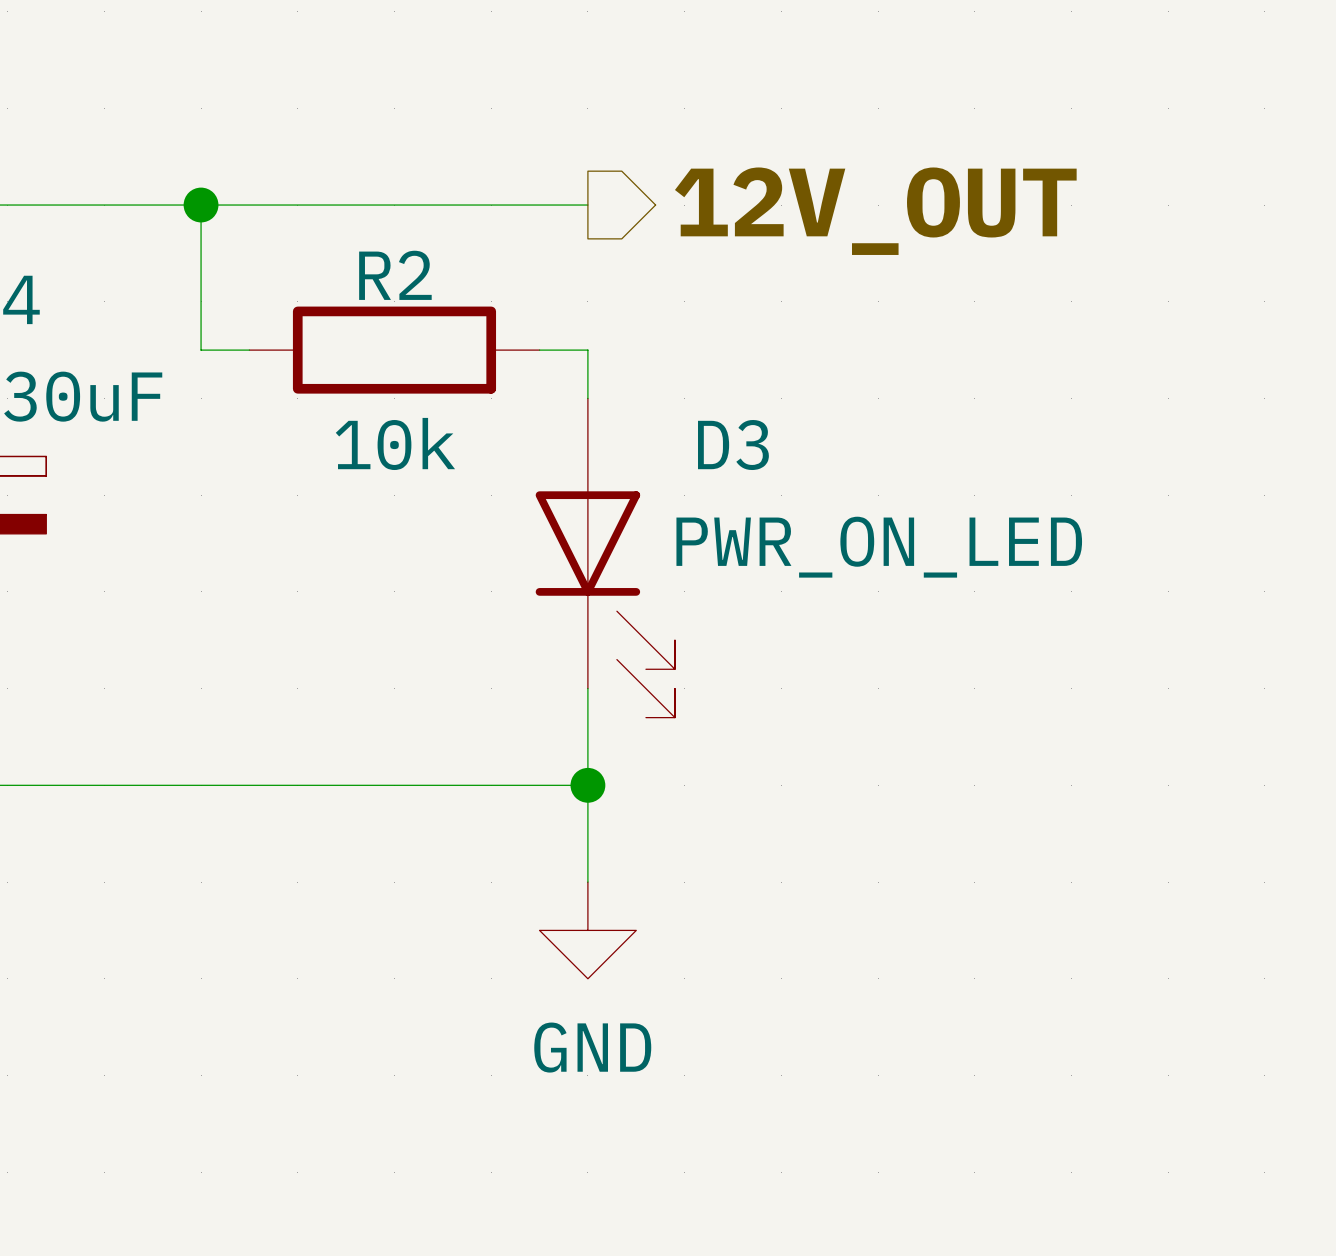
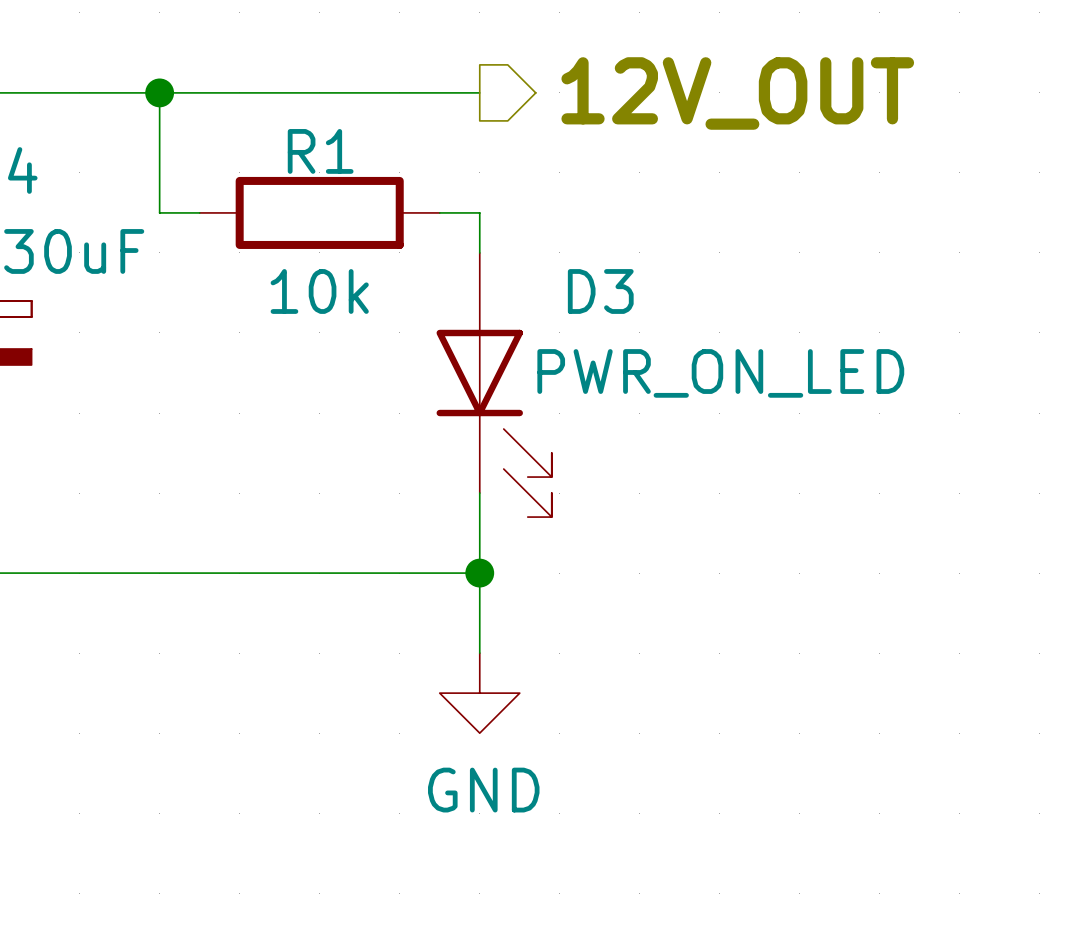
R2 name: R2 (395, 275) -> R1 (320, 151)

